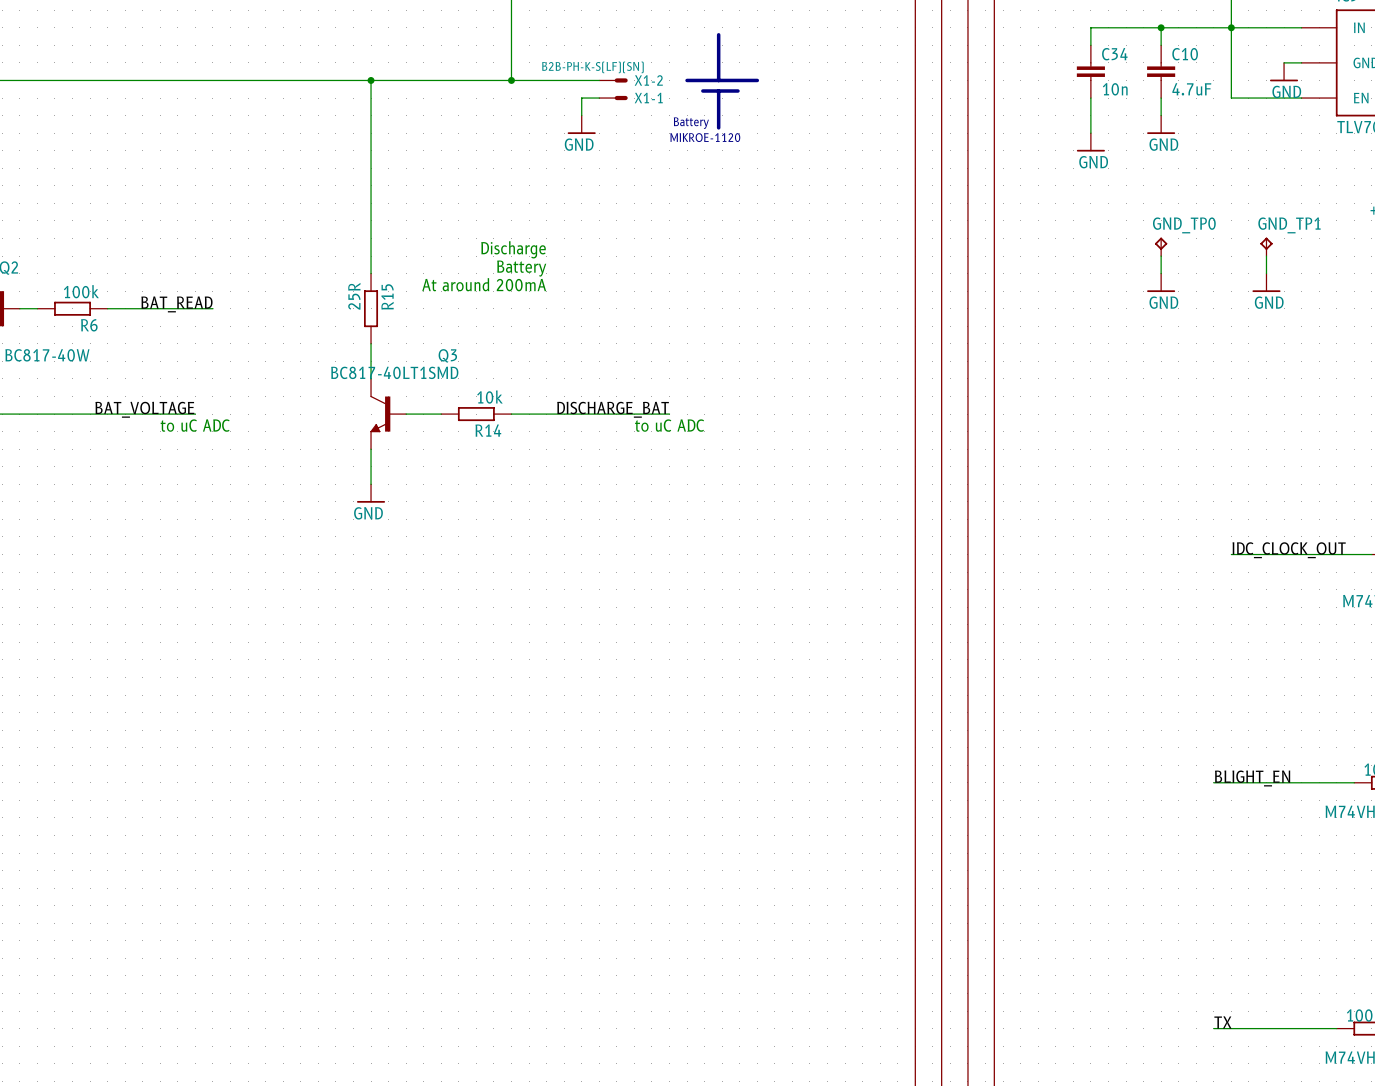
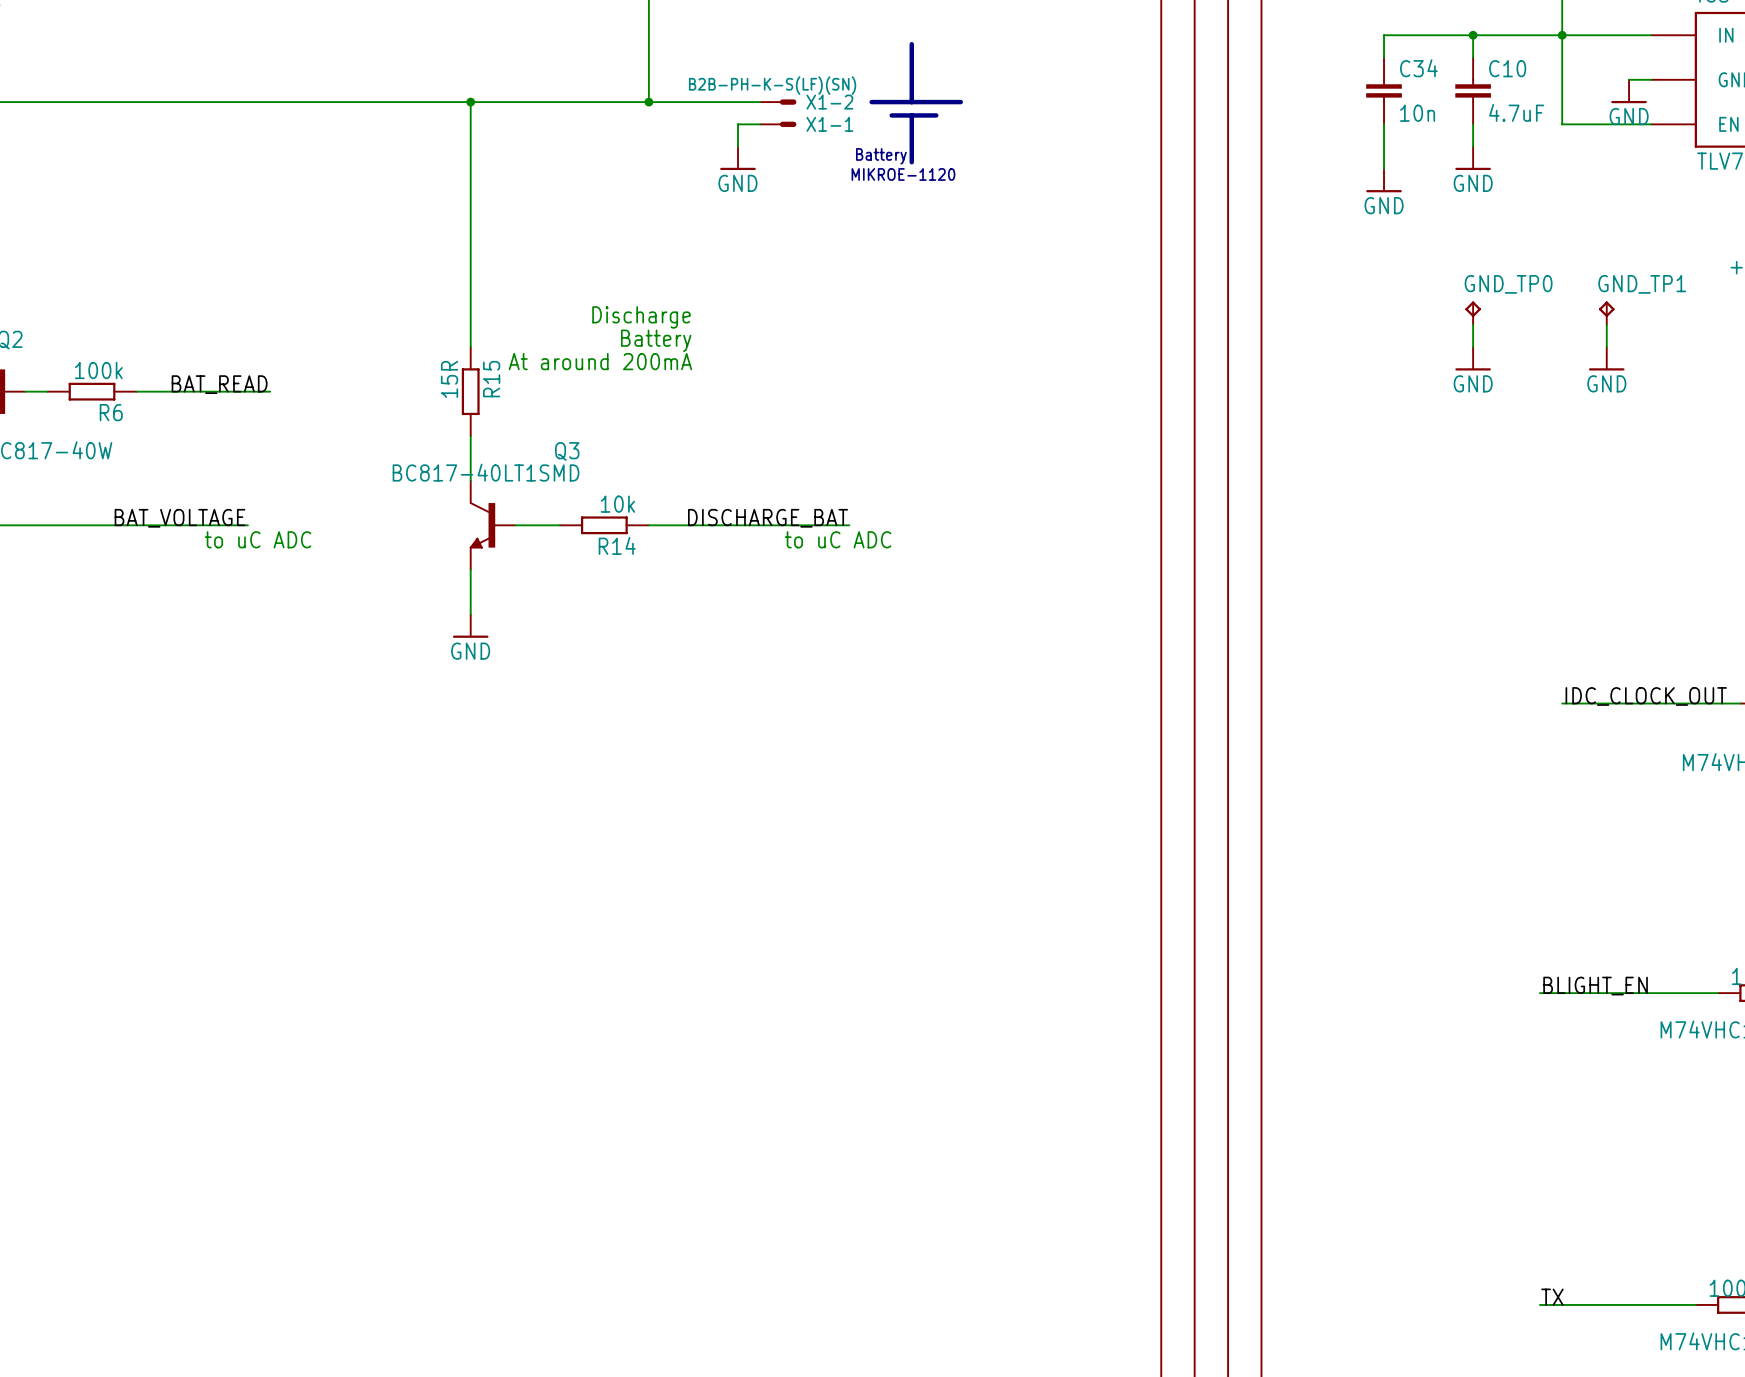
R15 value: 25R (354, 296) -> 15R (449, 379)

